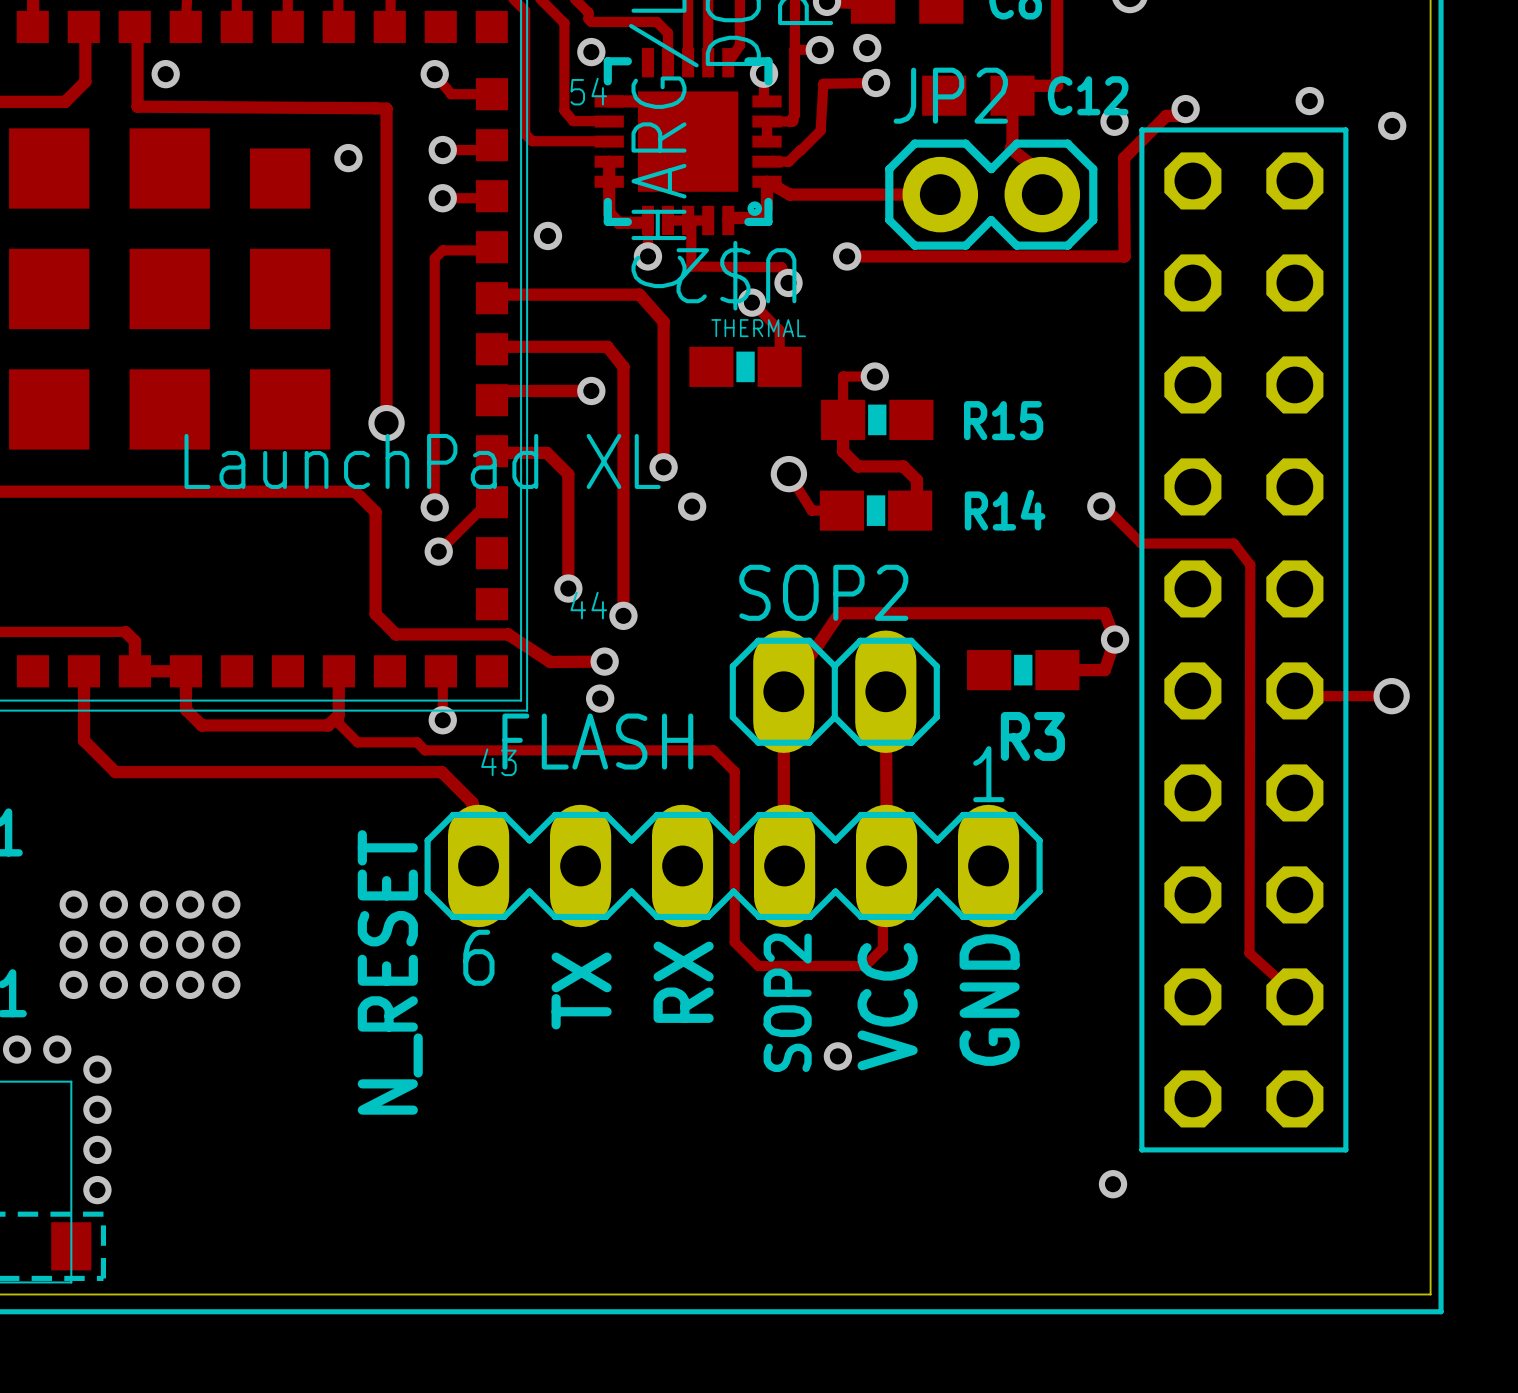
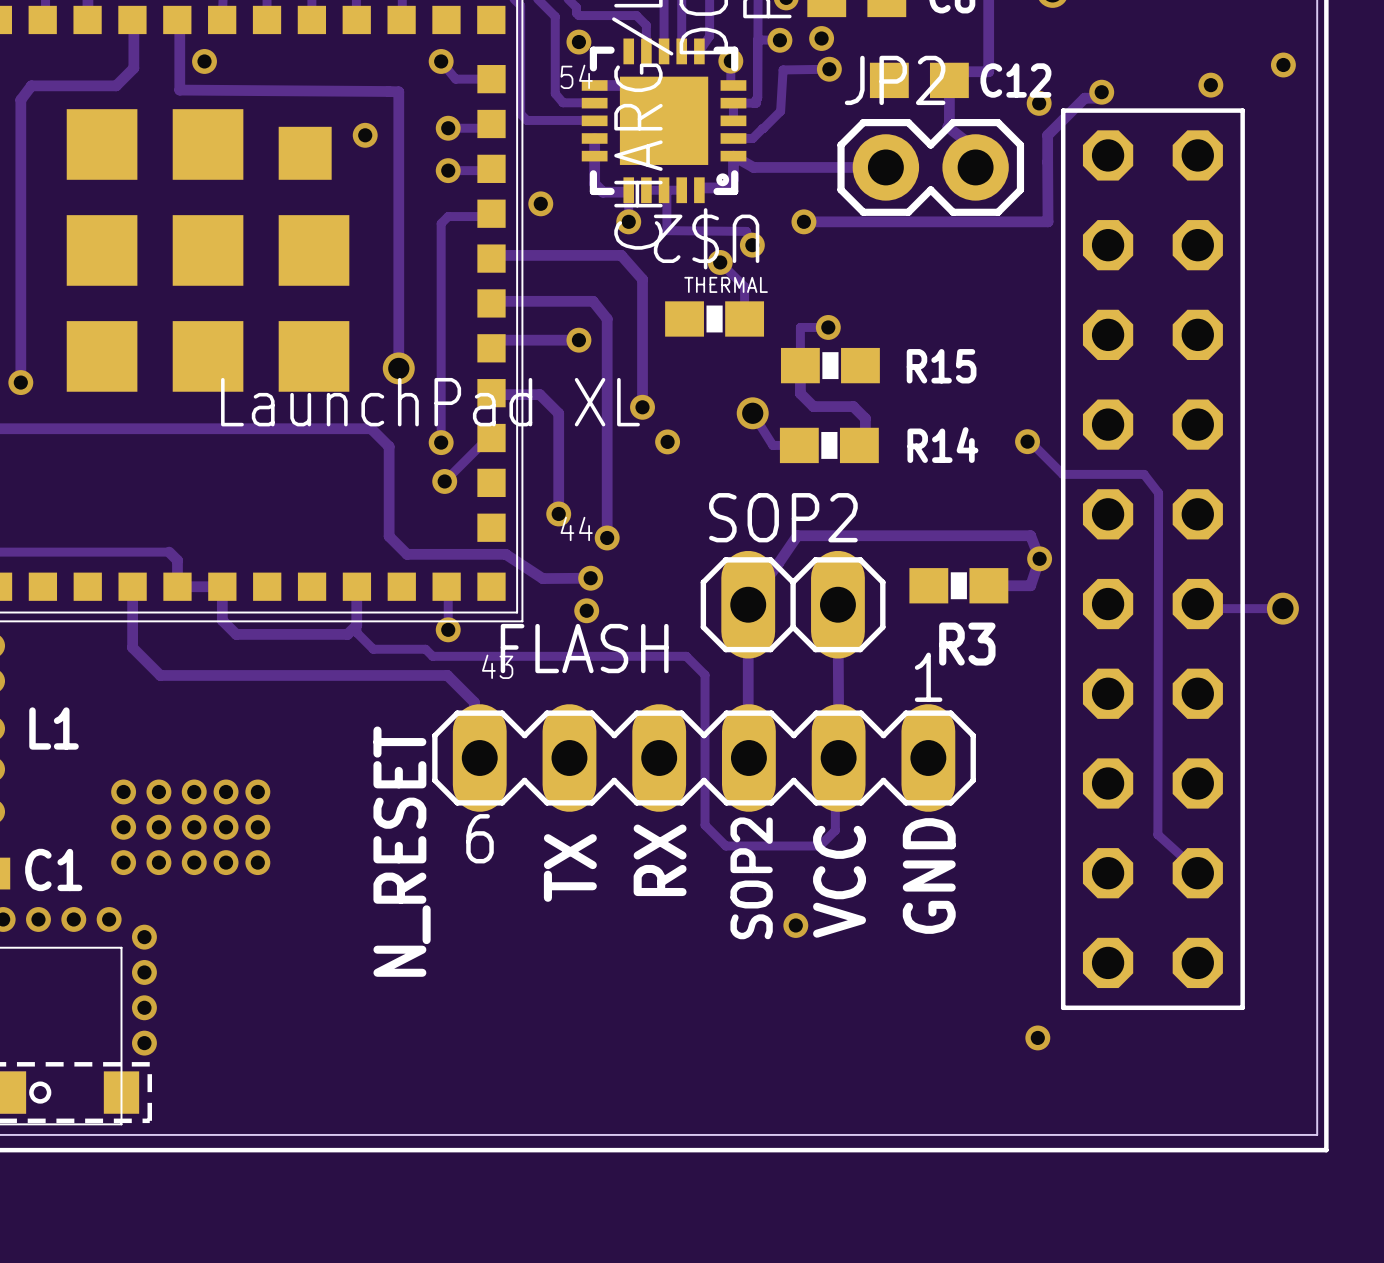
via position: (1392, 125) -> (1283, 65)

